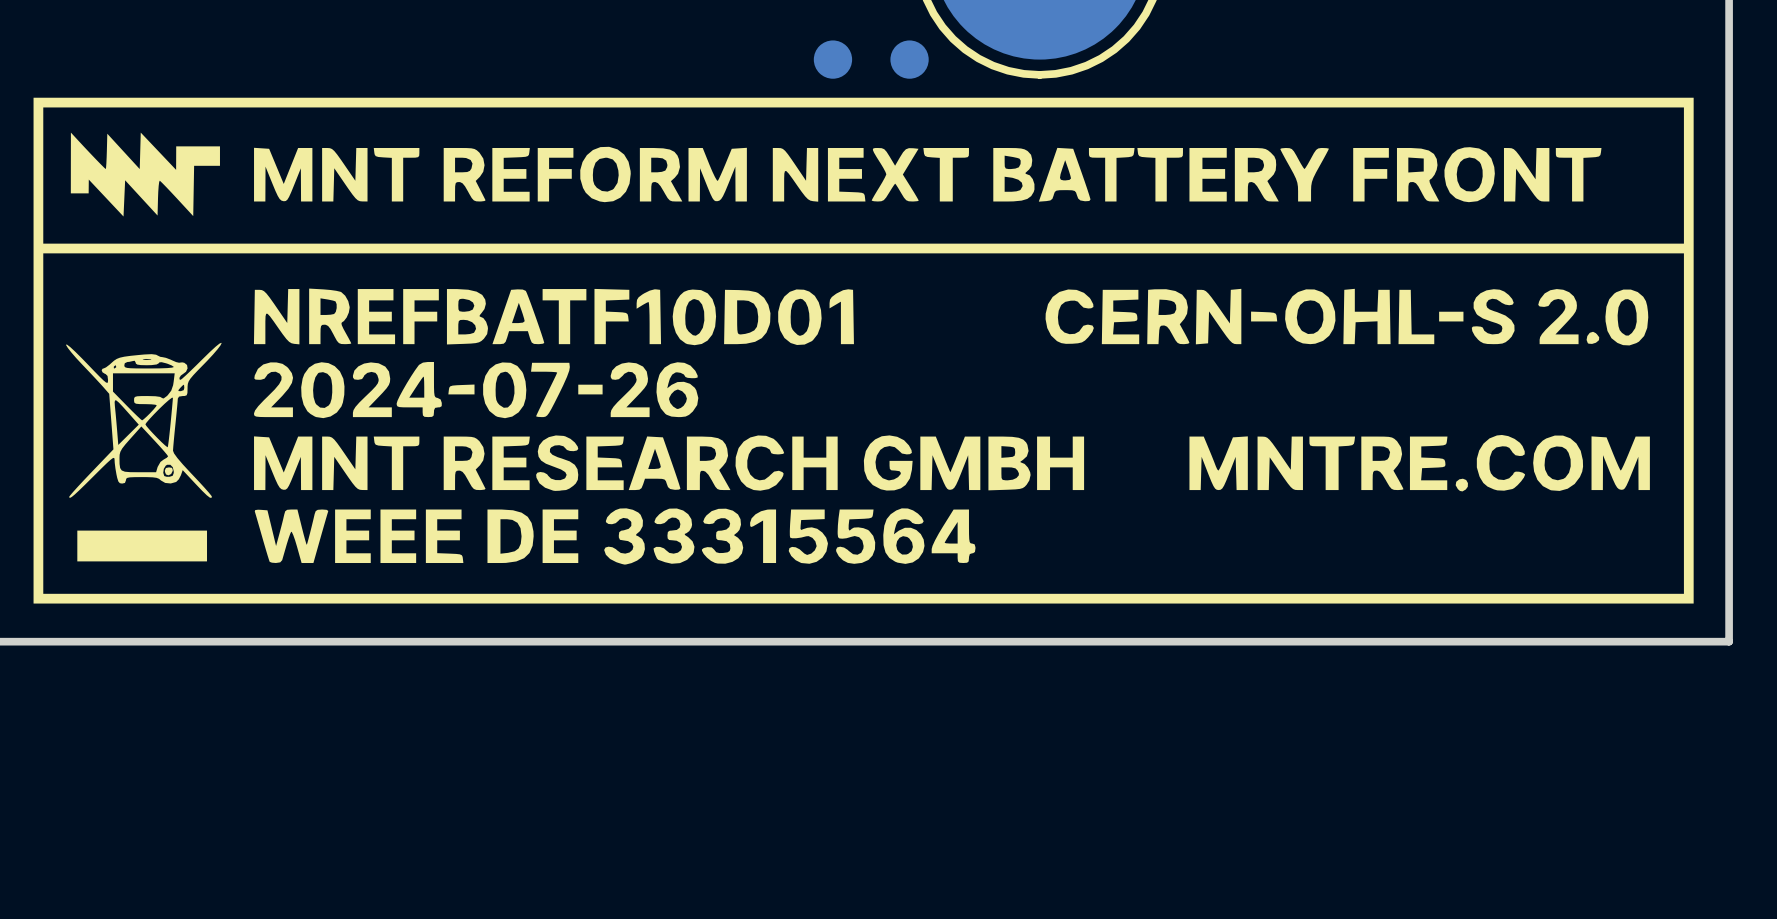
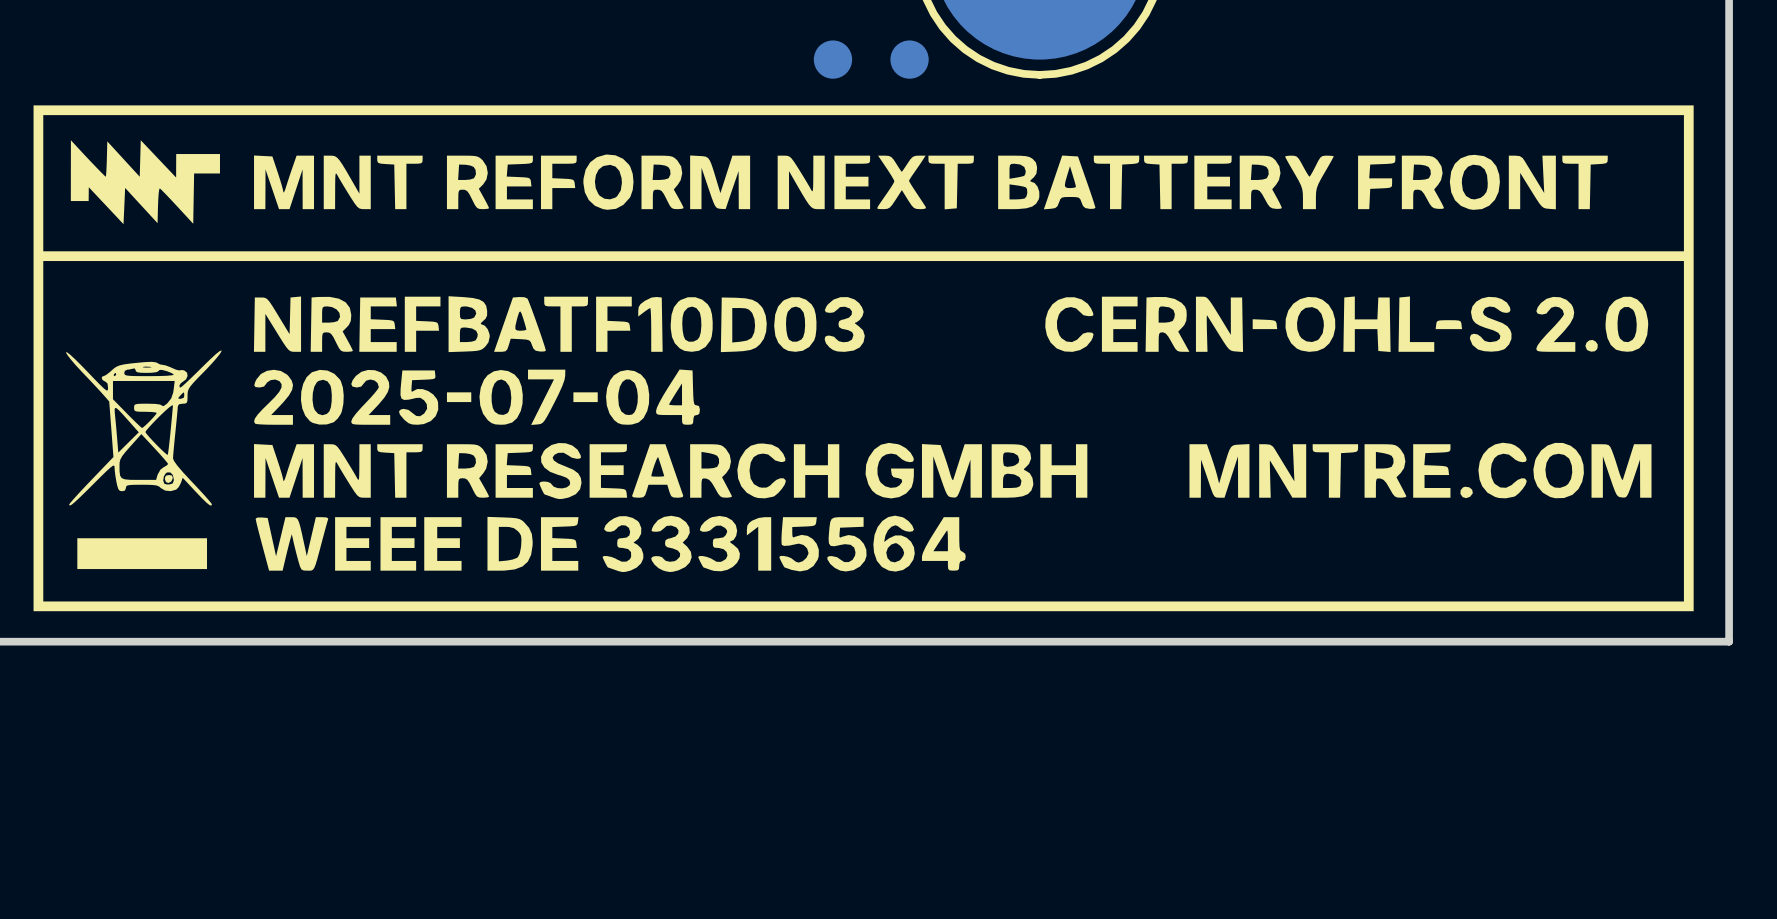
drawing shape: [33, 97, 1694, 604] -> [33, 105, 1694, 612]

